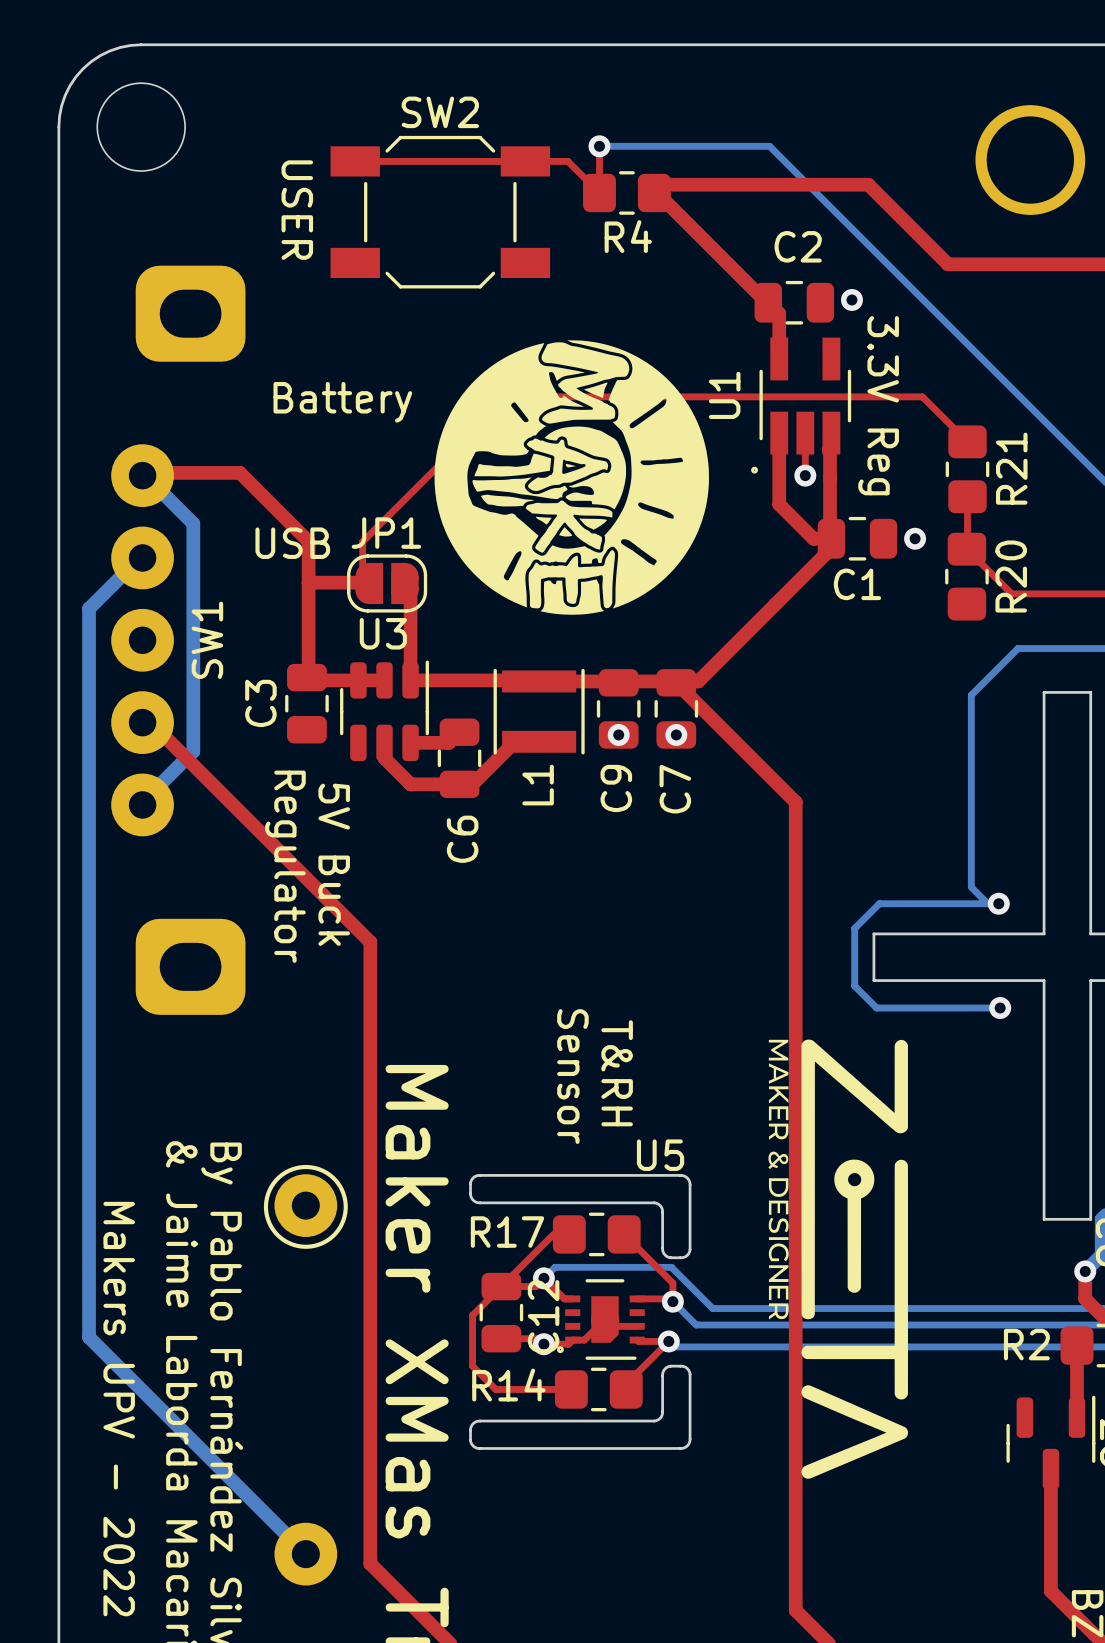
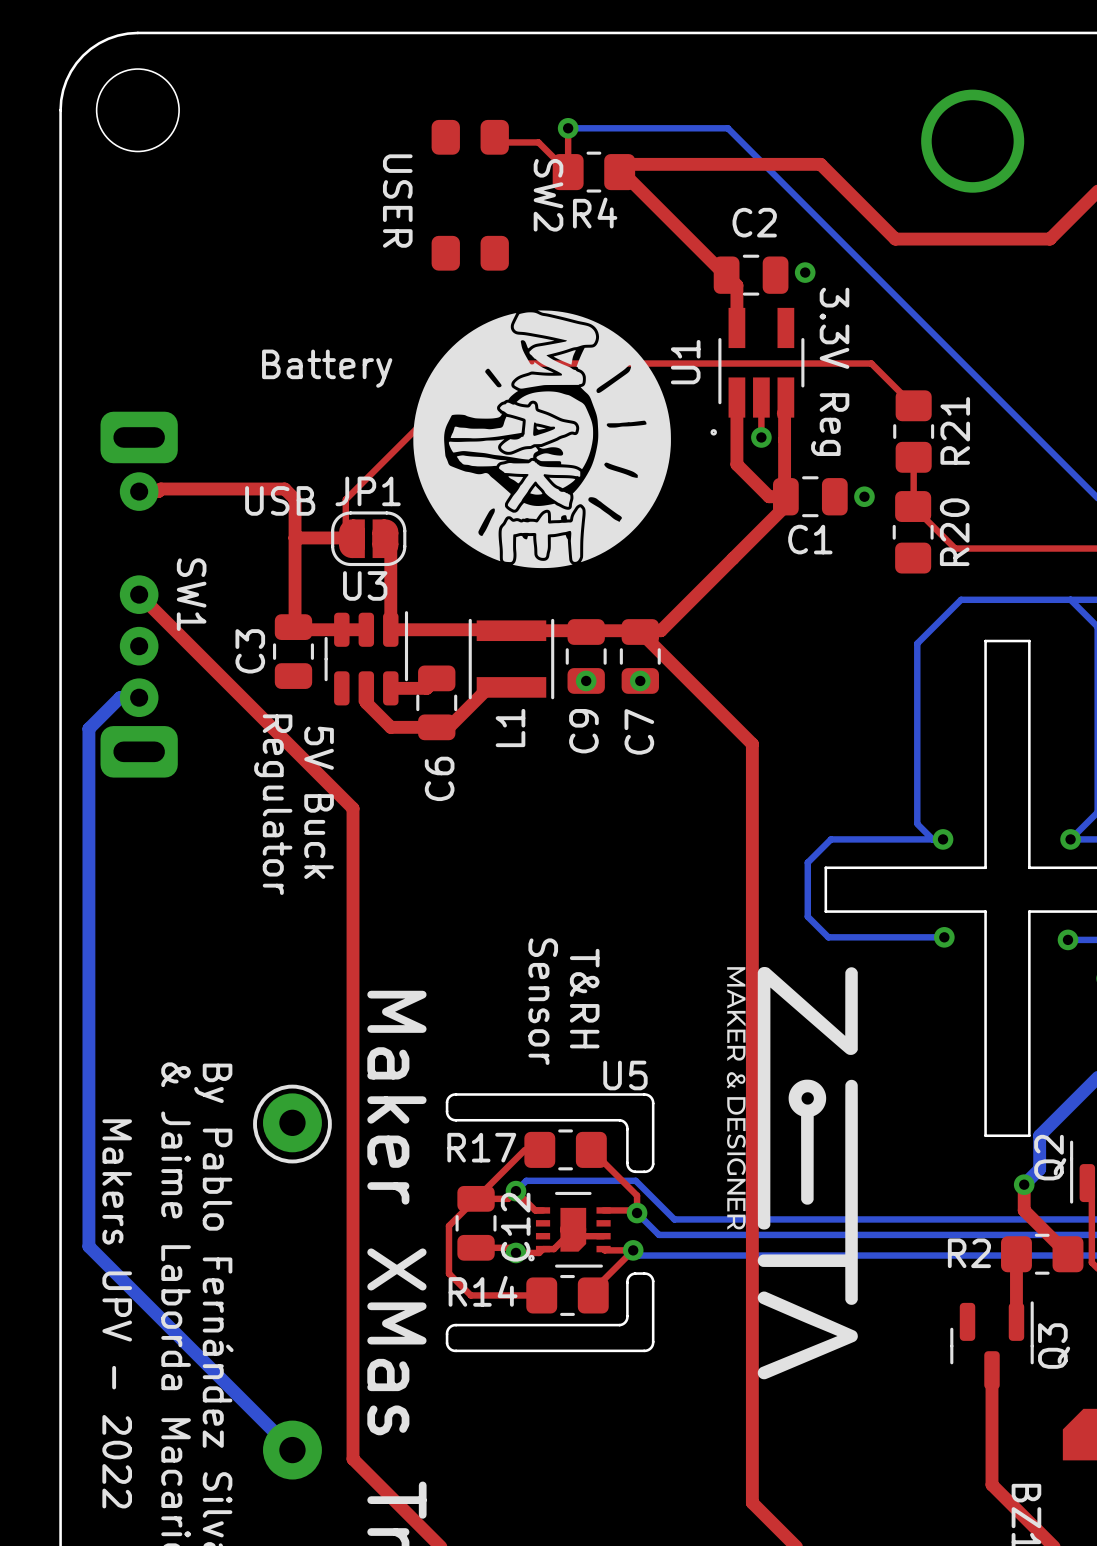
SW2 name position: SW2 (440, 112) -> SW2 (548, 195)
SW2 footprint: [330, 135, 551, 289] -> [431, 119, 509, 271]
top track: (355, 161) (525, 161) -> none
text position: USER (297, 210) -> USER (397, 201)
SW1 footprint: [111, 265, 246, 1015] -> [100, 411, 178, 778]
top track: (142, 472) (239, 472) (297, 530) -> (139, 491) (158, 491) (160, 489) (284, 489)
bottom track: (142, 472) (193, 523) (193, 751) (142, 802) -> none
bottom track: (142, 555) (89, 608) (89, 785) -> (139, 697) (120, 697) (88, 728)
top track: (142, 719) (148, 719) (370, 942) -> (139, 594) (353, 808) (353, 875)

